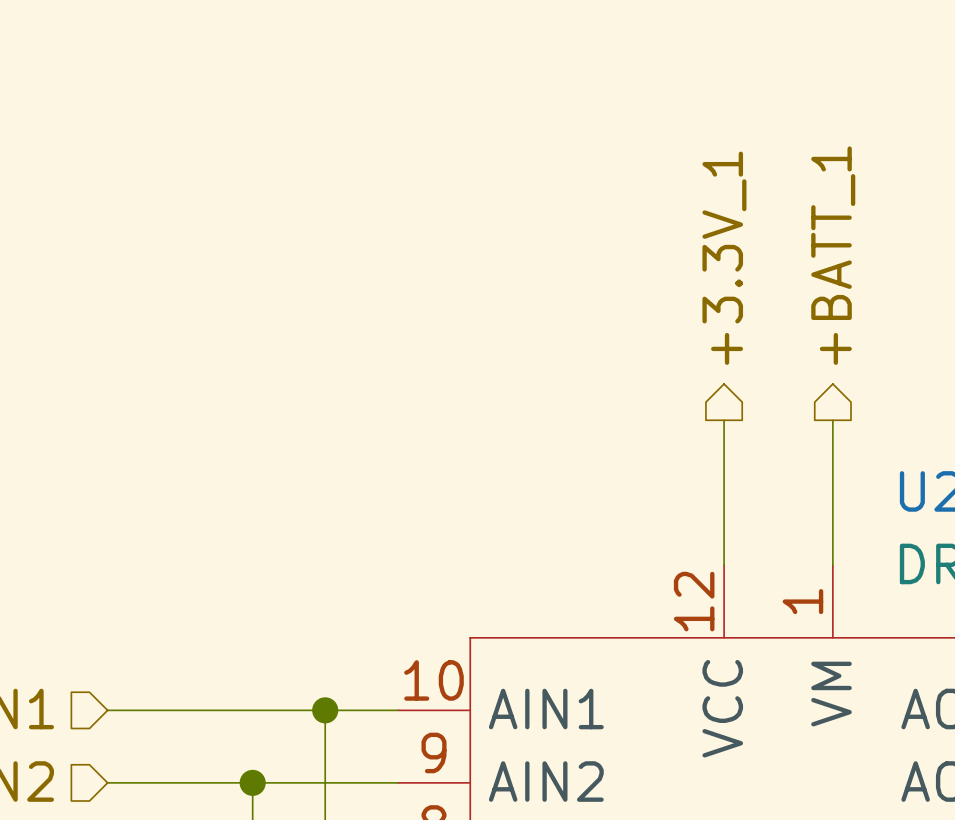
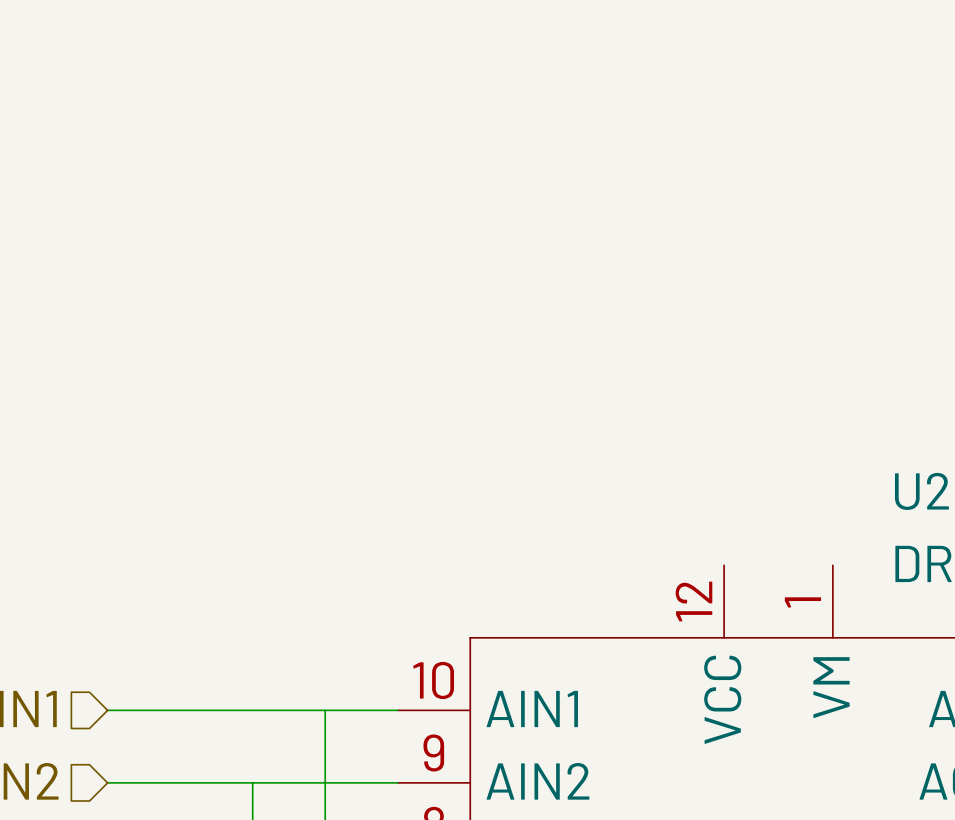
hierarchical label: +BATT_1 (833, 255) -> none
hierarchical label: +3.3V_1 (724, 258) -> none
wire: (724, 420) (724, 565) -> none
wire: (832, 420) (832, 565) -> none
junction: (325, 710) -> none
junction: (252, 782) -> none

